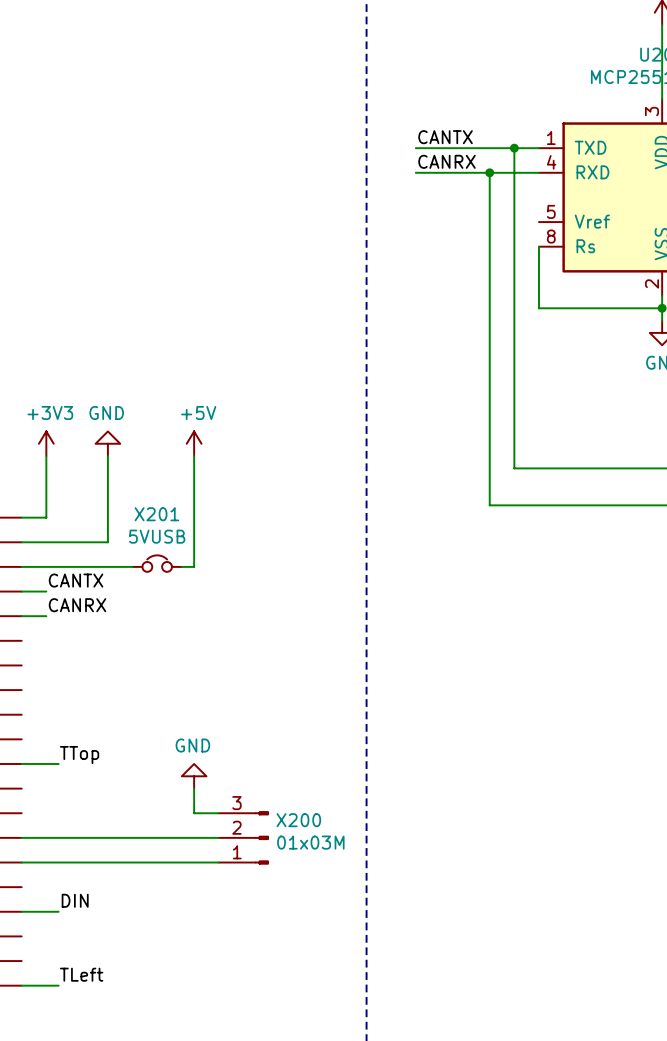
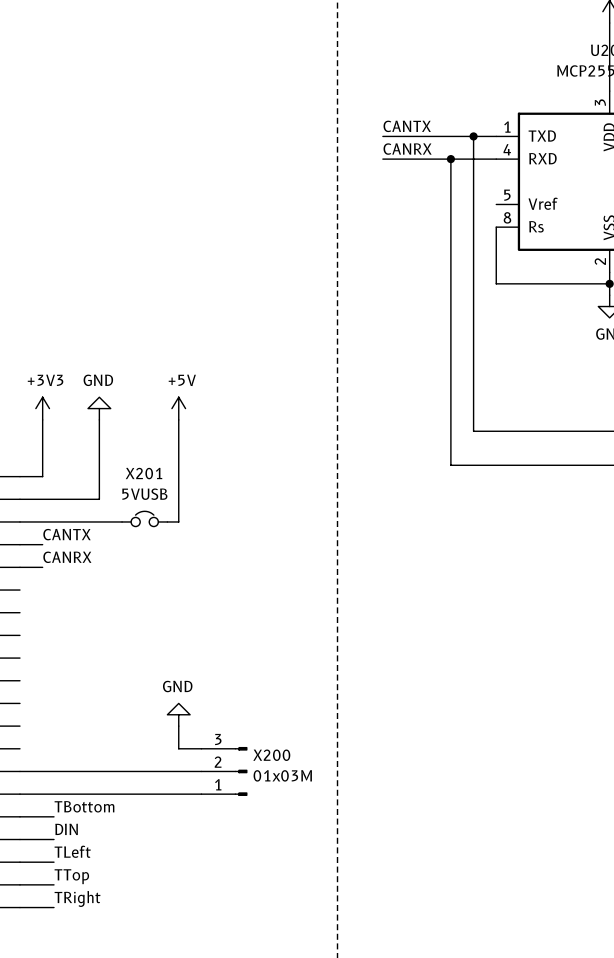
label position: TTop (79, 755) -> TTop (71, 876)
wire: (21, 763) (58, 763) -> (19, 816) (54, 816)
label: none -> TBottom (84, 806)
label: none -> TLeft (72, 851)
wire: none -> (19, 862) (54, 862)
wire: none -> (19, 884) (54, 884)
label: TLeft (81, 974) -> TRight (77, 898)

